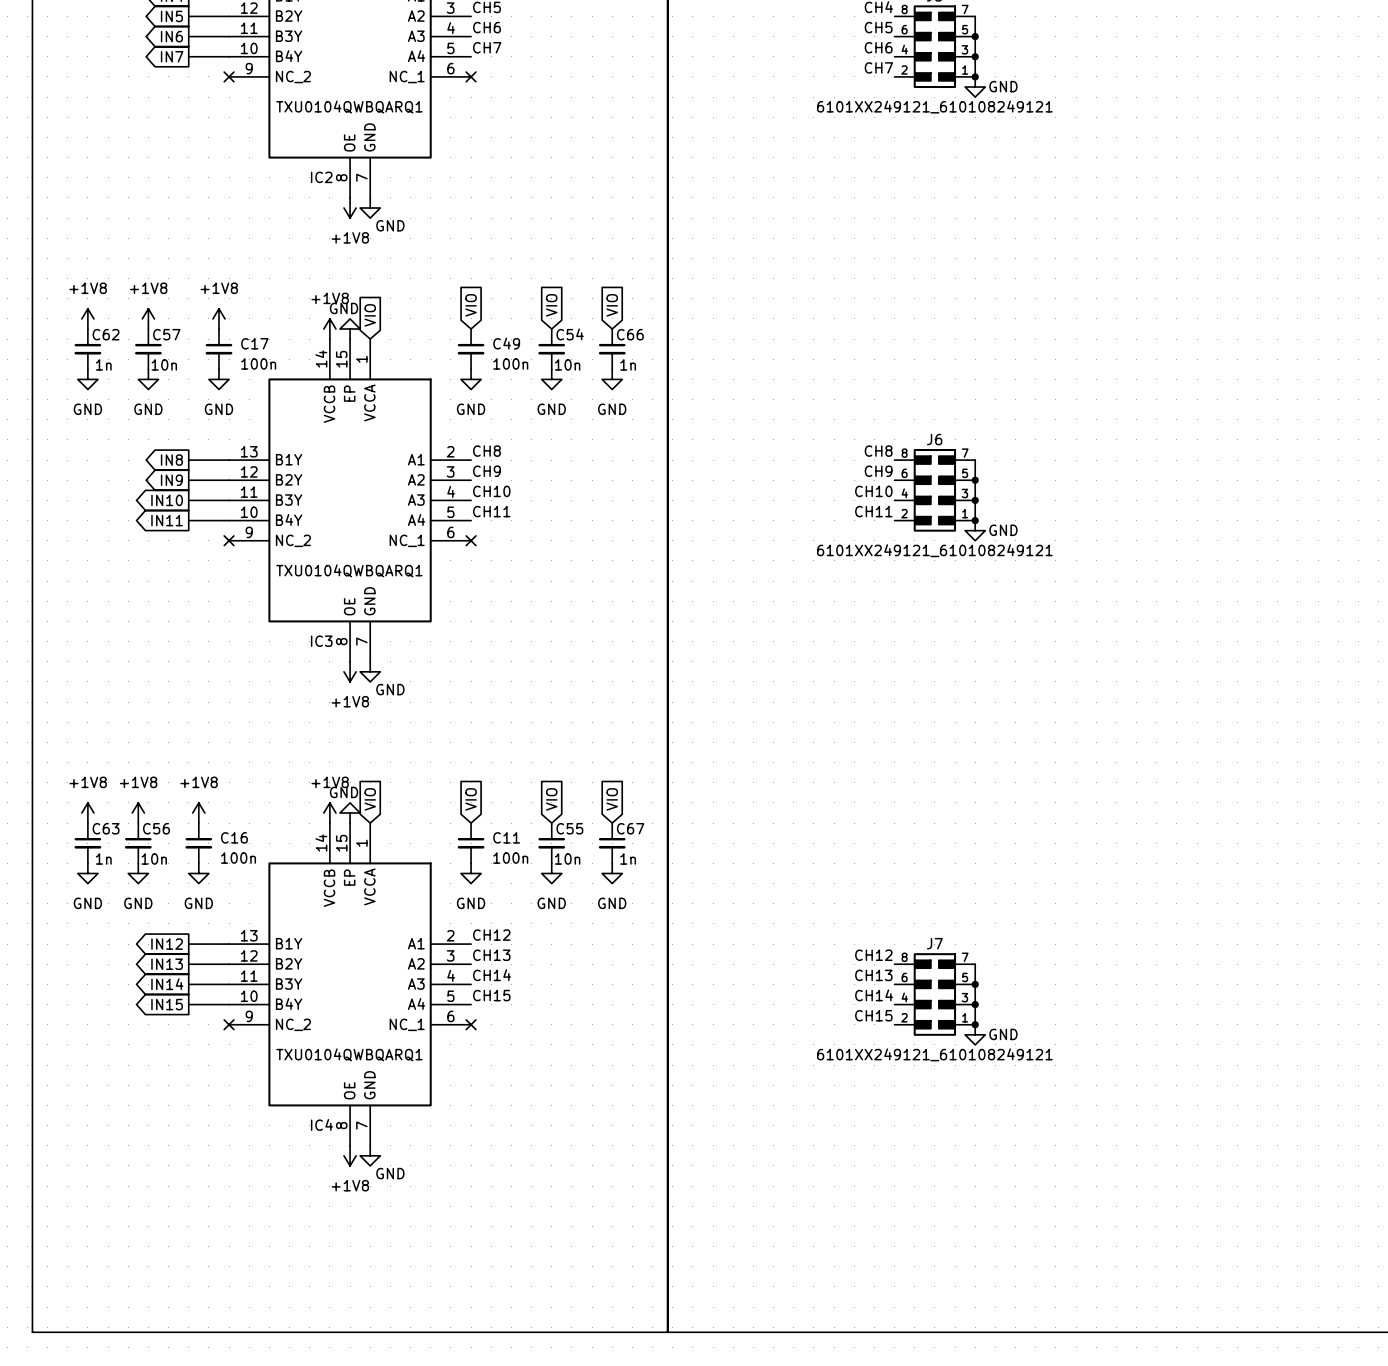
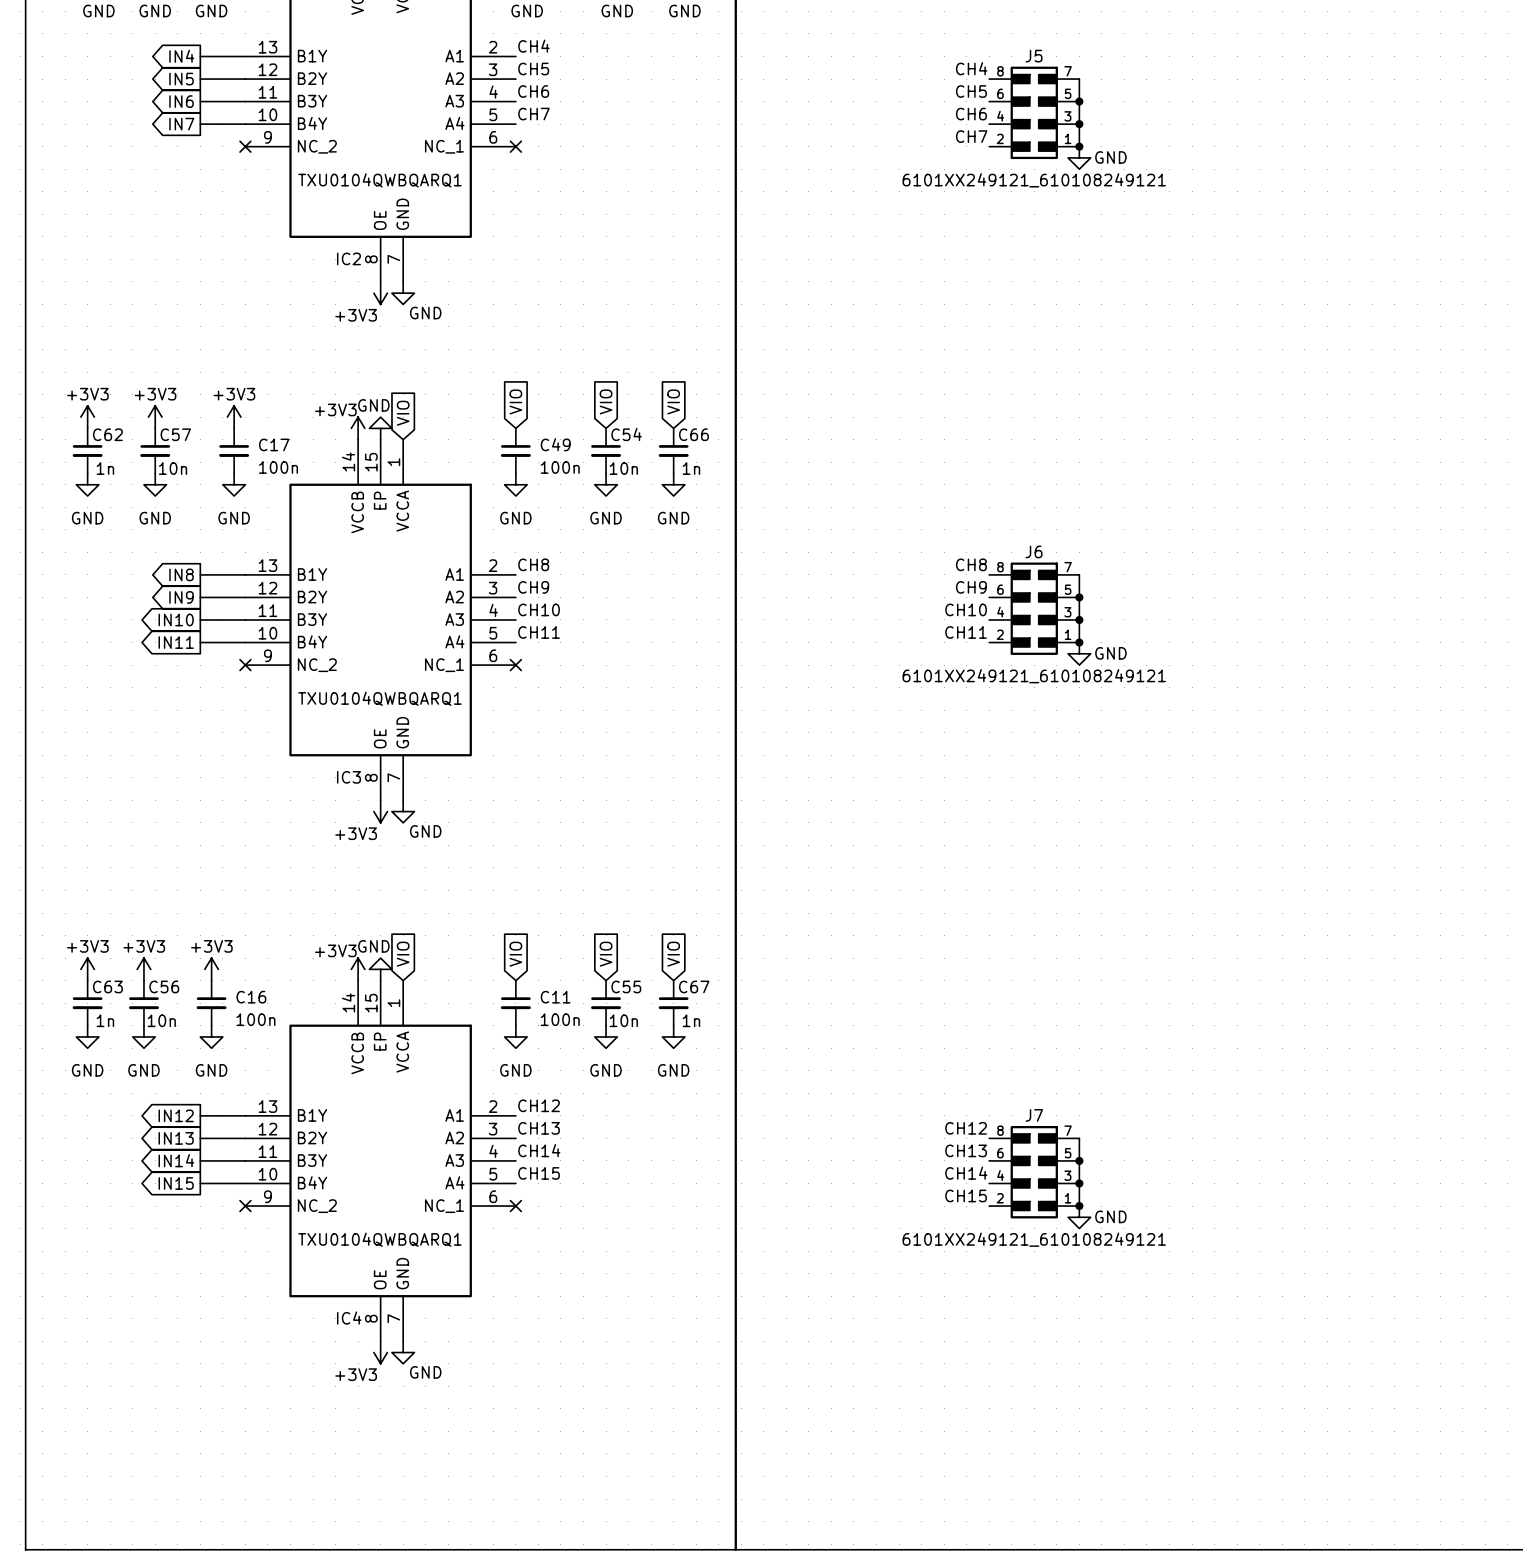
power symbol: +1V8 (350, 208) -> +3V3 (380, 293)
power symbol: +1V8 (87, 318) -> +3V3 (87, 417)
power symbol: +1V8 (148, 318) -> +3V3 (155, 417)
power symbol: +1V8 (218, 318) -> +3V3 (234, 417)
power symbol: +1V8 (329, 329) -> +3V3 (358, 428)
power symbol: +1V8 (350, 671) -> +3V3 (380, 811)
power symbol: +1V8 (87, 812) -> +3V3 (87, 969)
power symbol: +1V8 (138, 812) -> +3V3 (143, 969)
power symbol: +1V8 (198, 812) -> +3V3 (211, 969)
power symbol: +1V8 (329, 812) -> +3V3 (358, 969)
power symbol: +1V8 (350, 1155) -> +3V3 (380, 1352)

